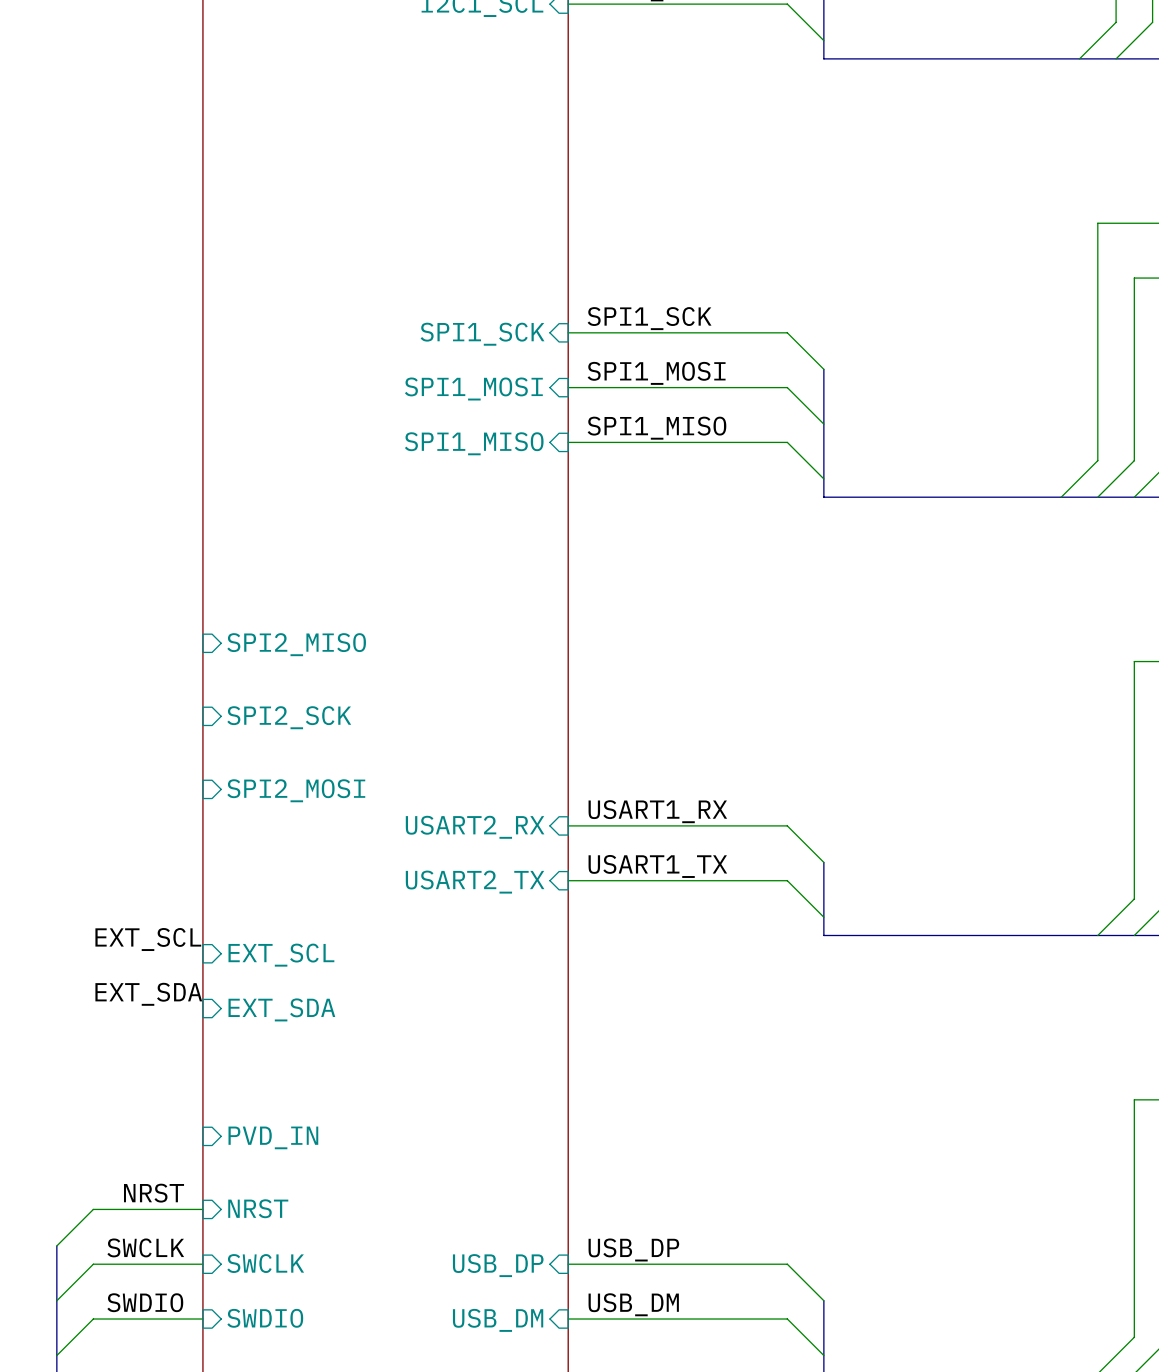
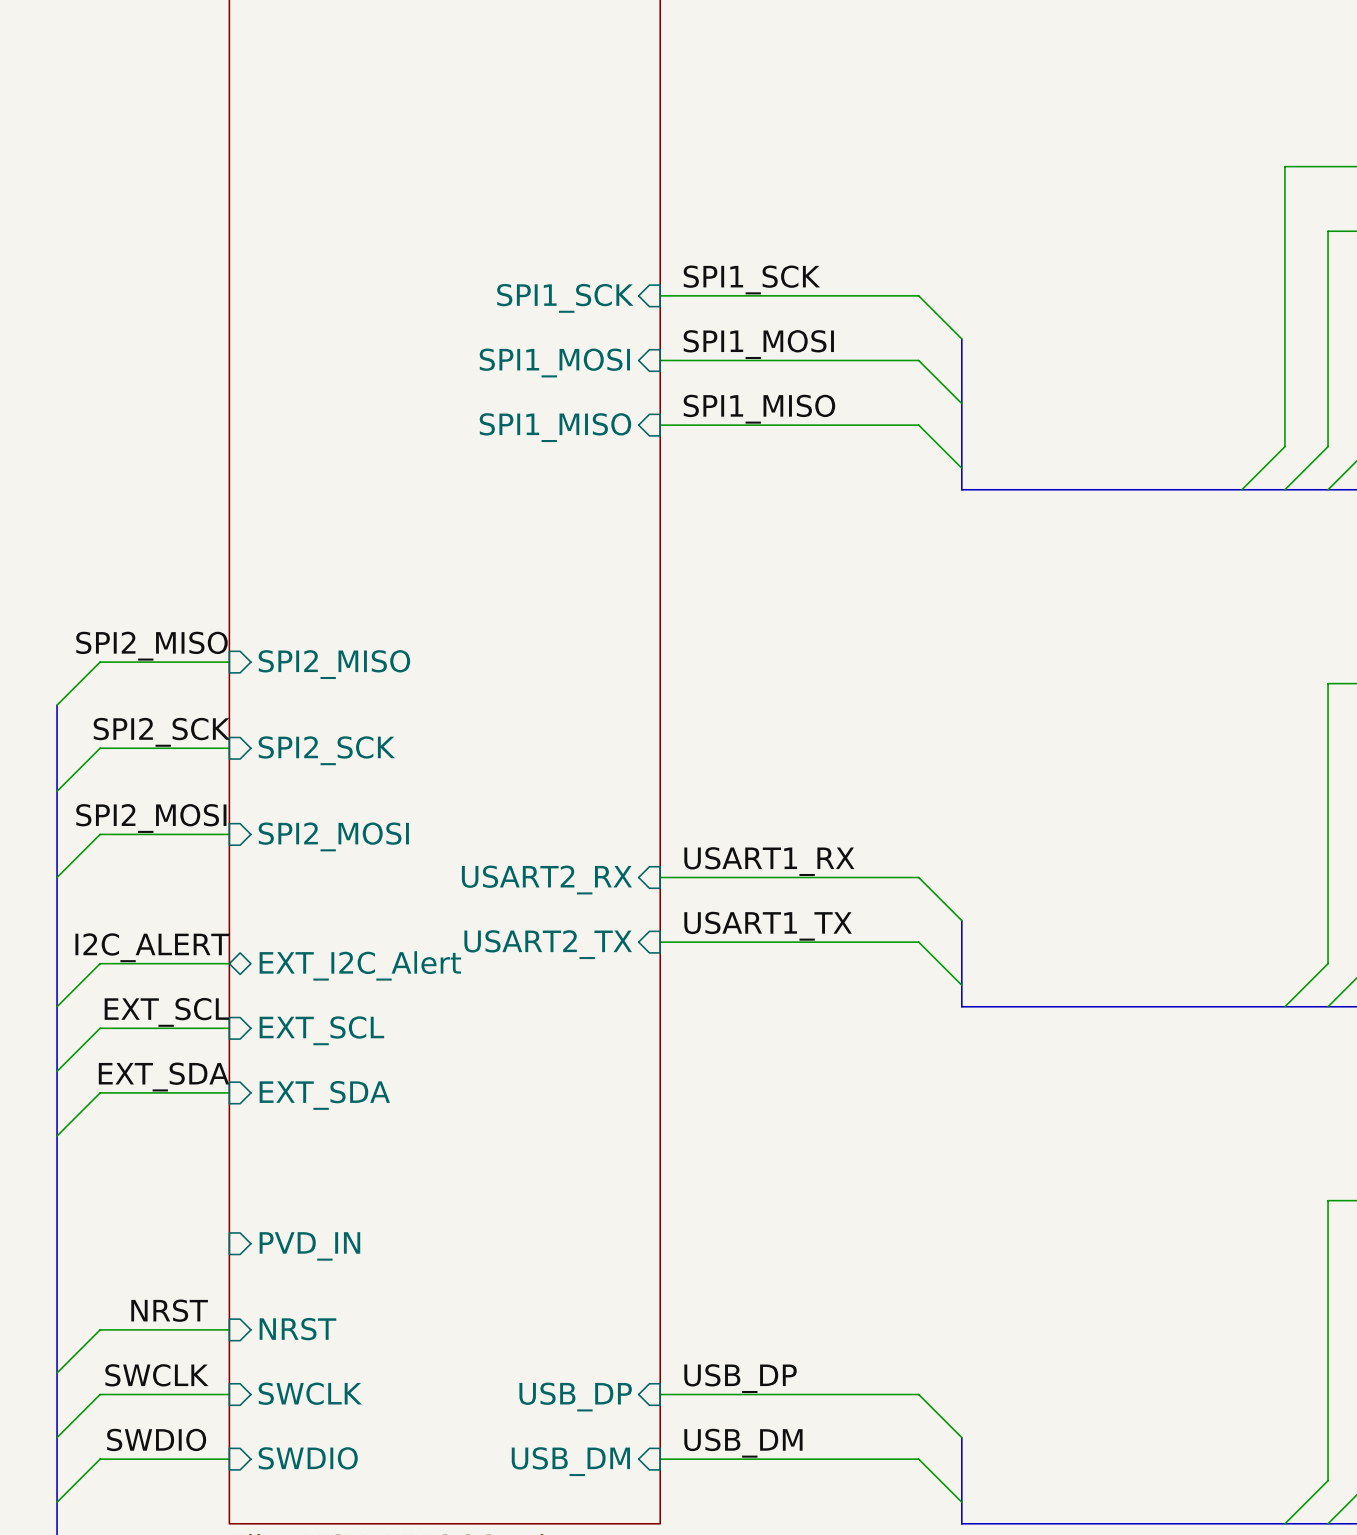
label: none -> SPI2_MISO (151, 646)
wire: none -> (229, 662) (100, 662) (57, 705)
bus: none -> (57, 705) (57, 1372)
label: none -> SPI2_SCK (161, 732)
wire: none -> (229, 748) (100, 748) (57, 791)
label: none -> SPI2_MOSI (151, 818)
wire: none -> (229, 834) (100, 834) (57, 877)
label: none -> I2C_ALERT (152, 947)
wire: none -> (229, 963) (100, 963) (57, 1006)
sheet pin: none -> EXT_I2C_Alert (360, 965)
wire: none -> (229, 1028) (100, 1028) (57, 1071)
wire: none -> (229, 1092) (100, 1092) (57, 1136)

